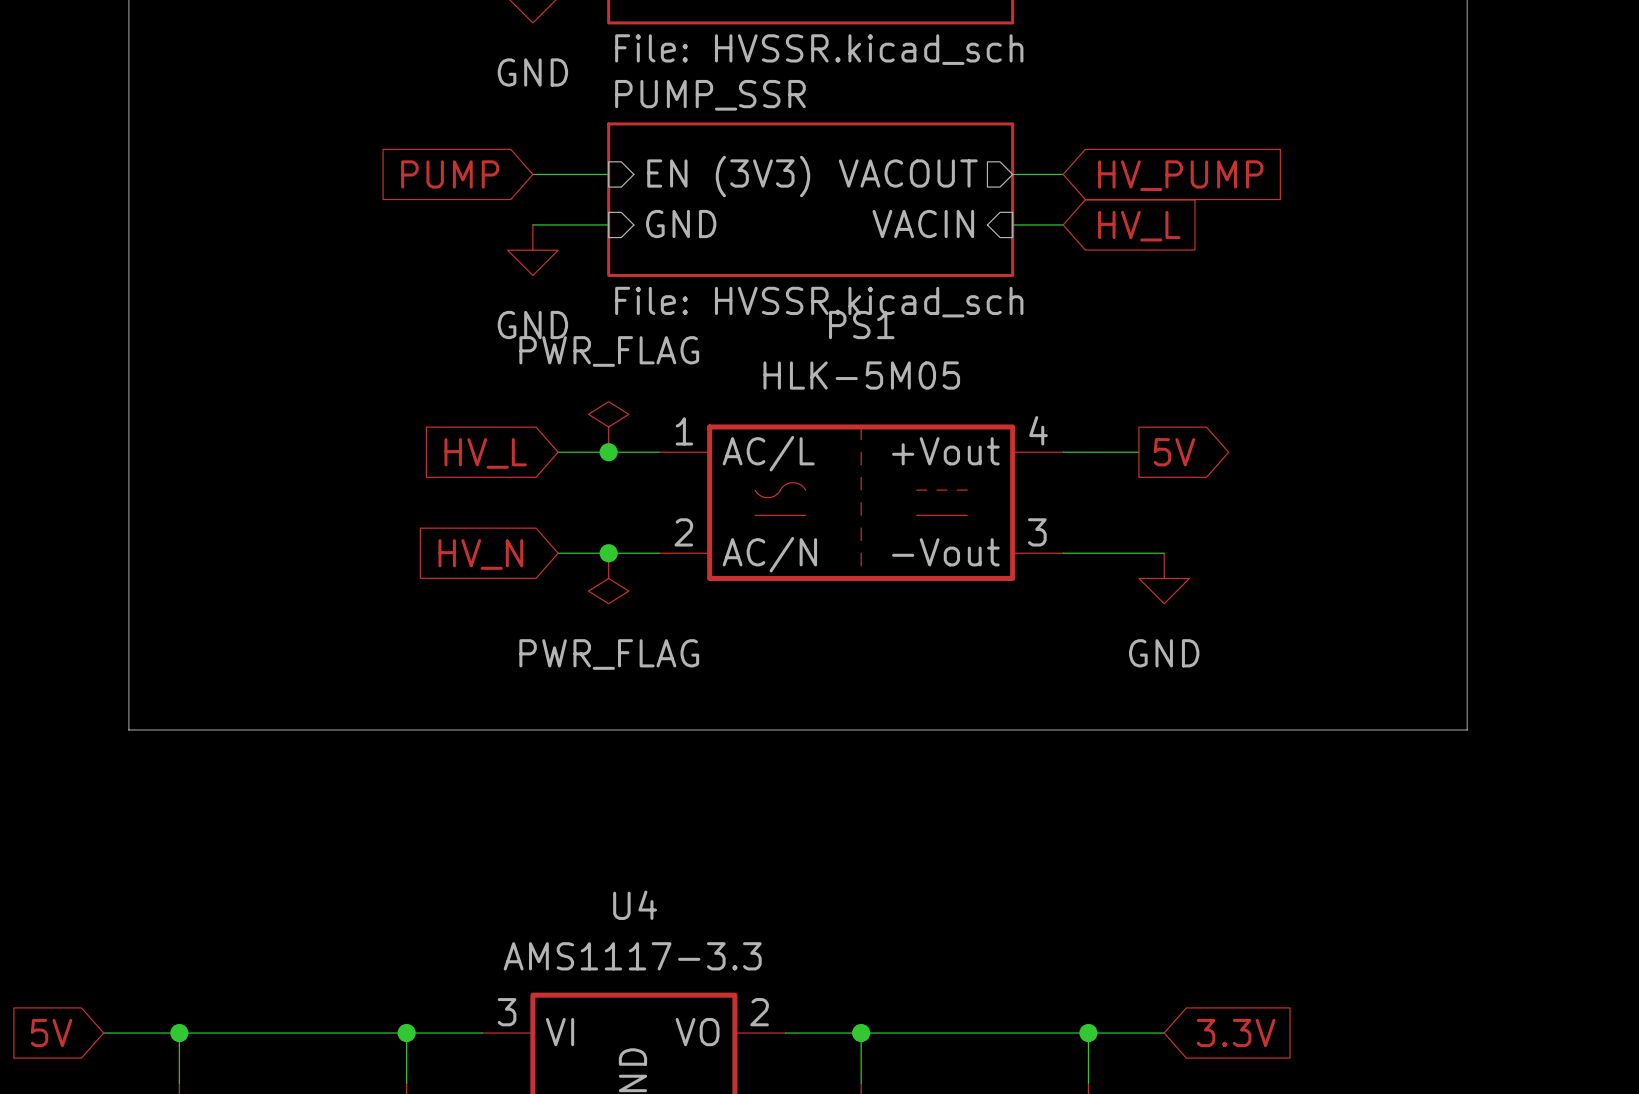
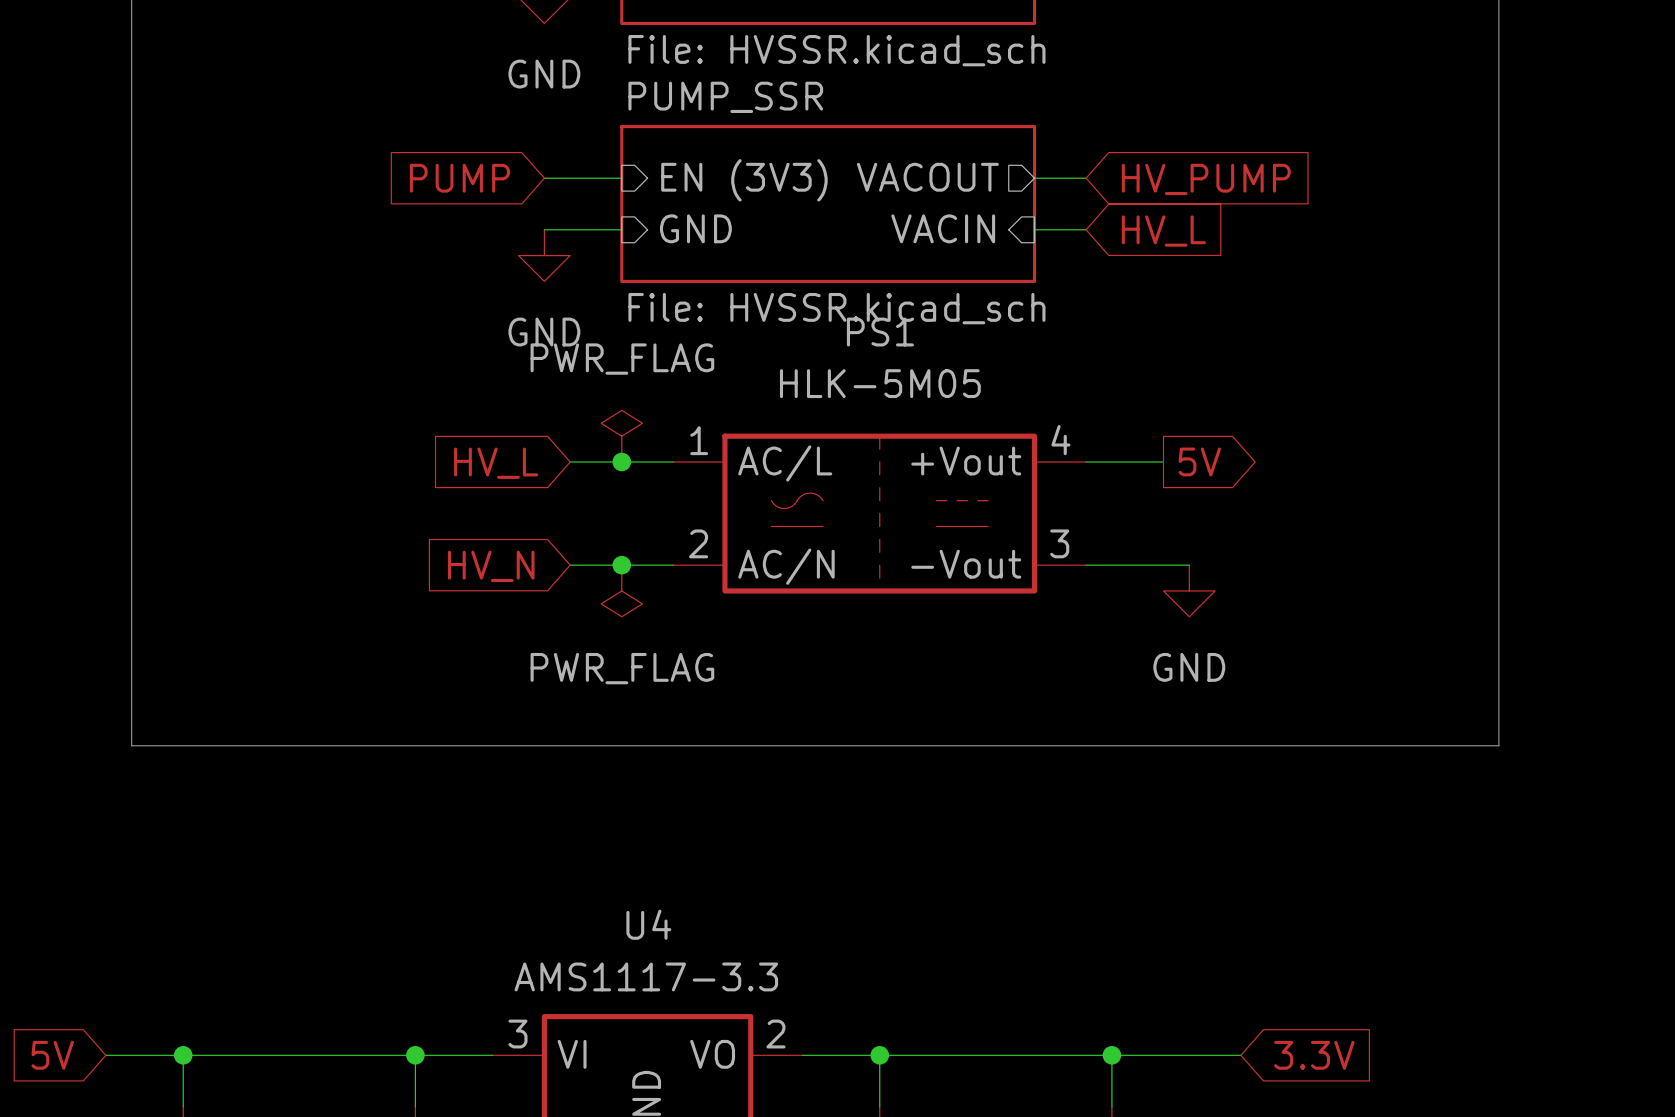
wire: none -> (1189, 1055) (1240, 1055)
global label position: 3.3V (1236, 1033) -> 3.3V (1314, 1055)

